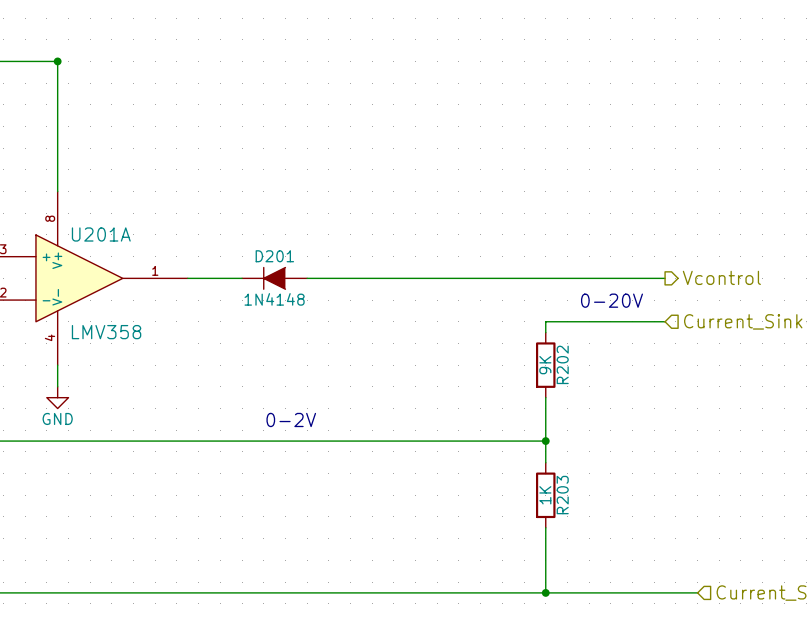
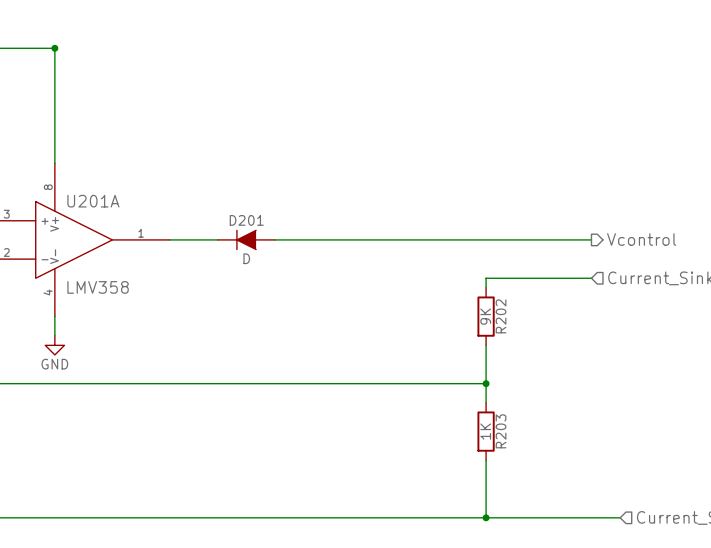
D201 value: 1N4148 (274, 299) -> D (246, 258)
text: 0-20V (612, 300) -> none
text: 0-2V (291, 419) -> none

